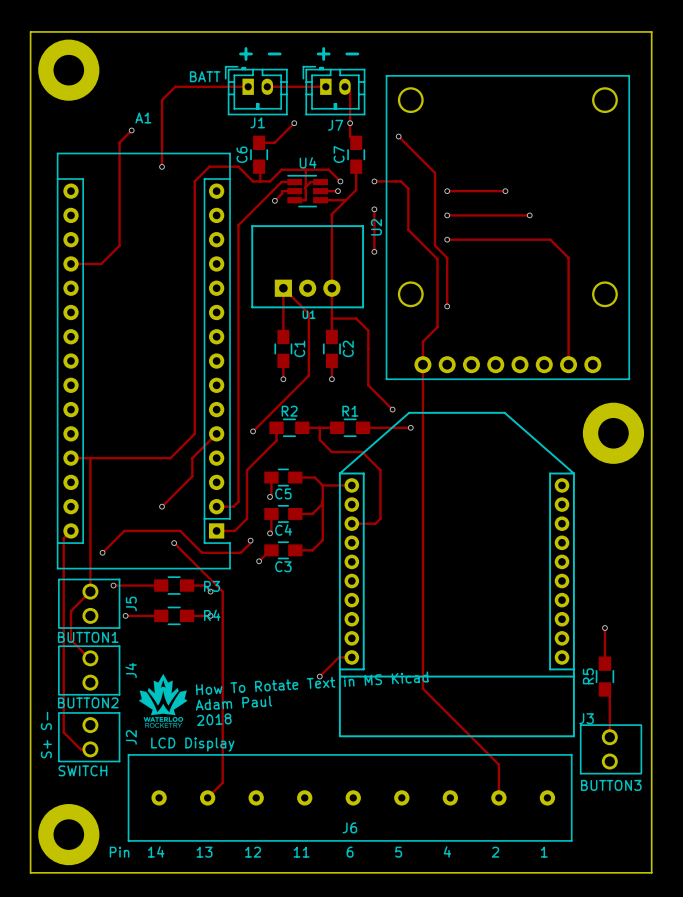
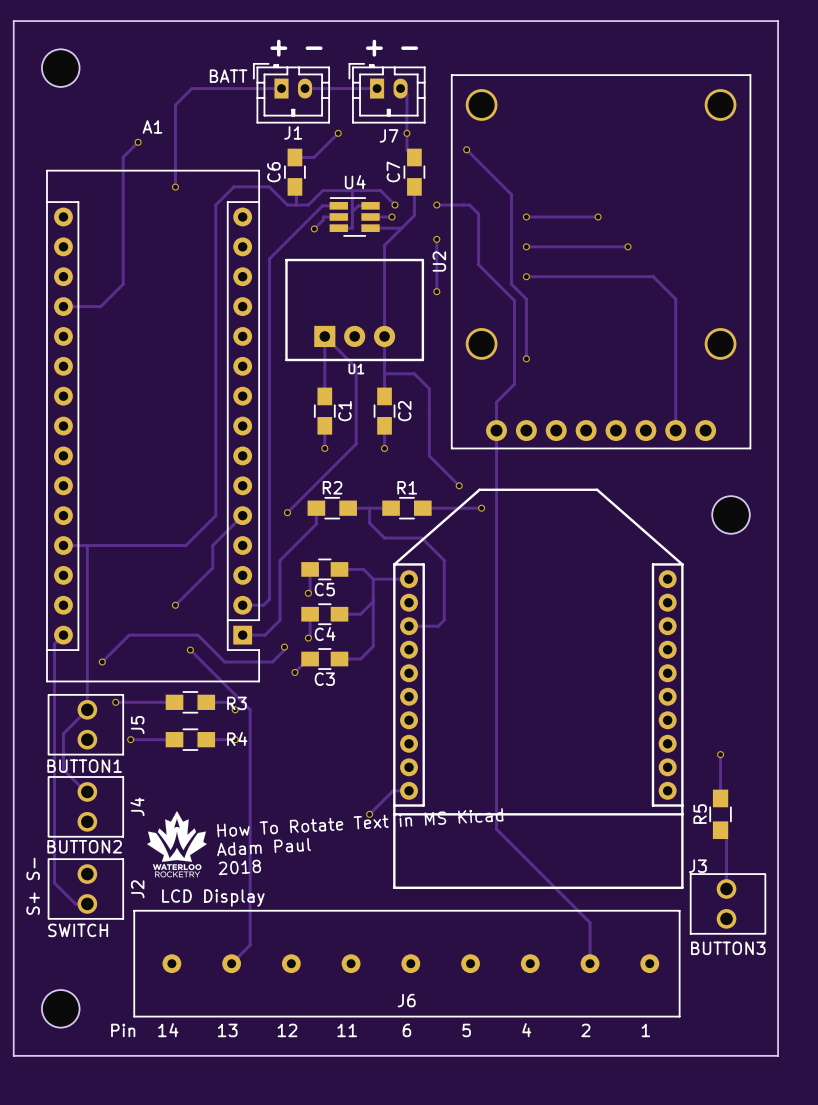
part footprint: [38, 39, 100, 101] -> [41, 49, 80, 87]
part footprint: [582, 402, 645, 464] -> [712, 496, 750, 534]
part footprint: [38, 804, 100, 866] -> [41, 990, 80, 1028]

